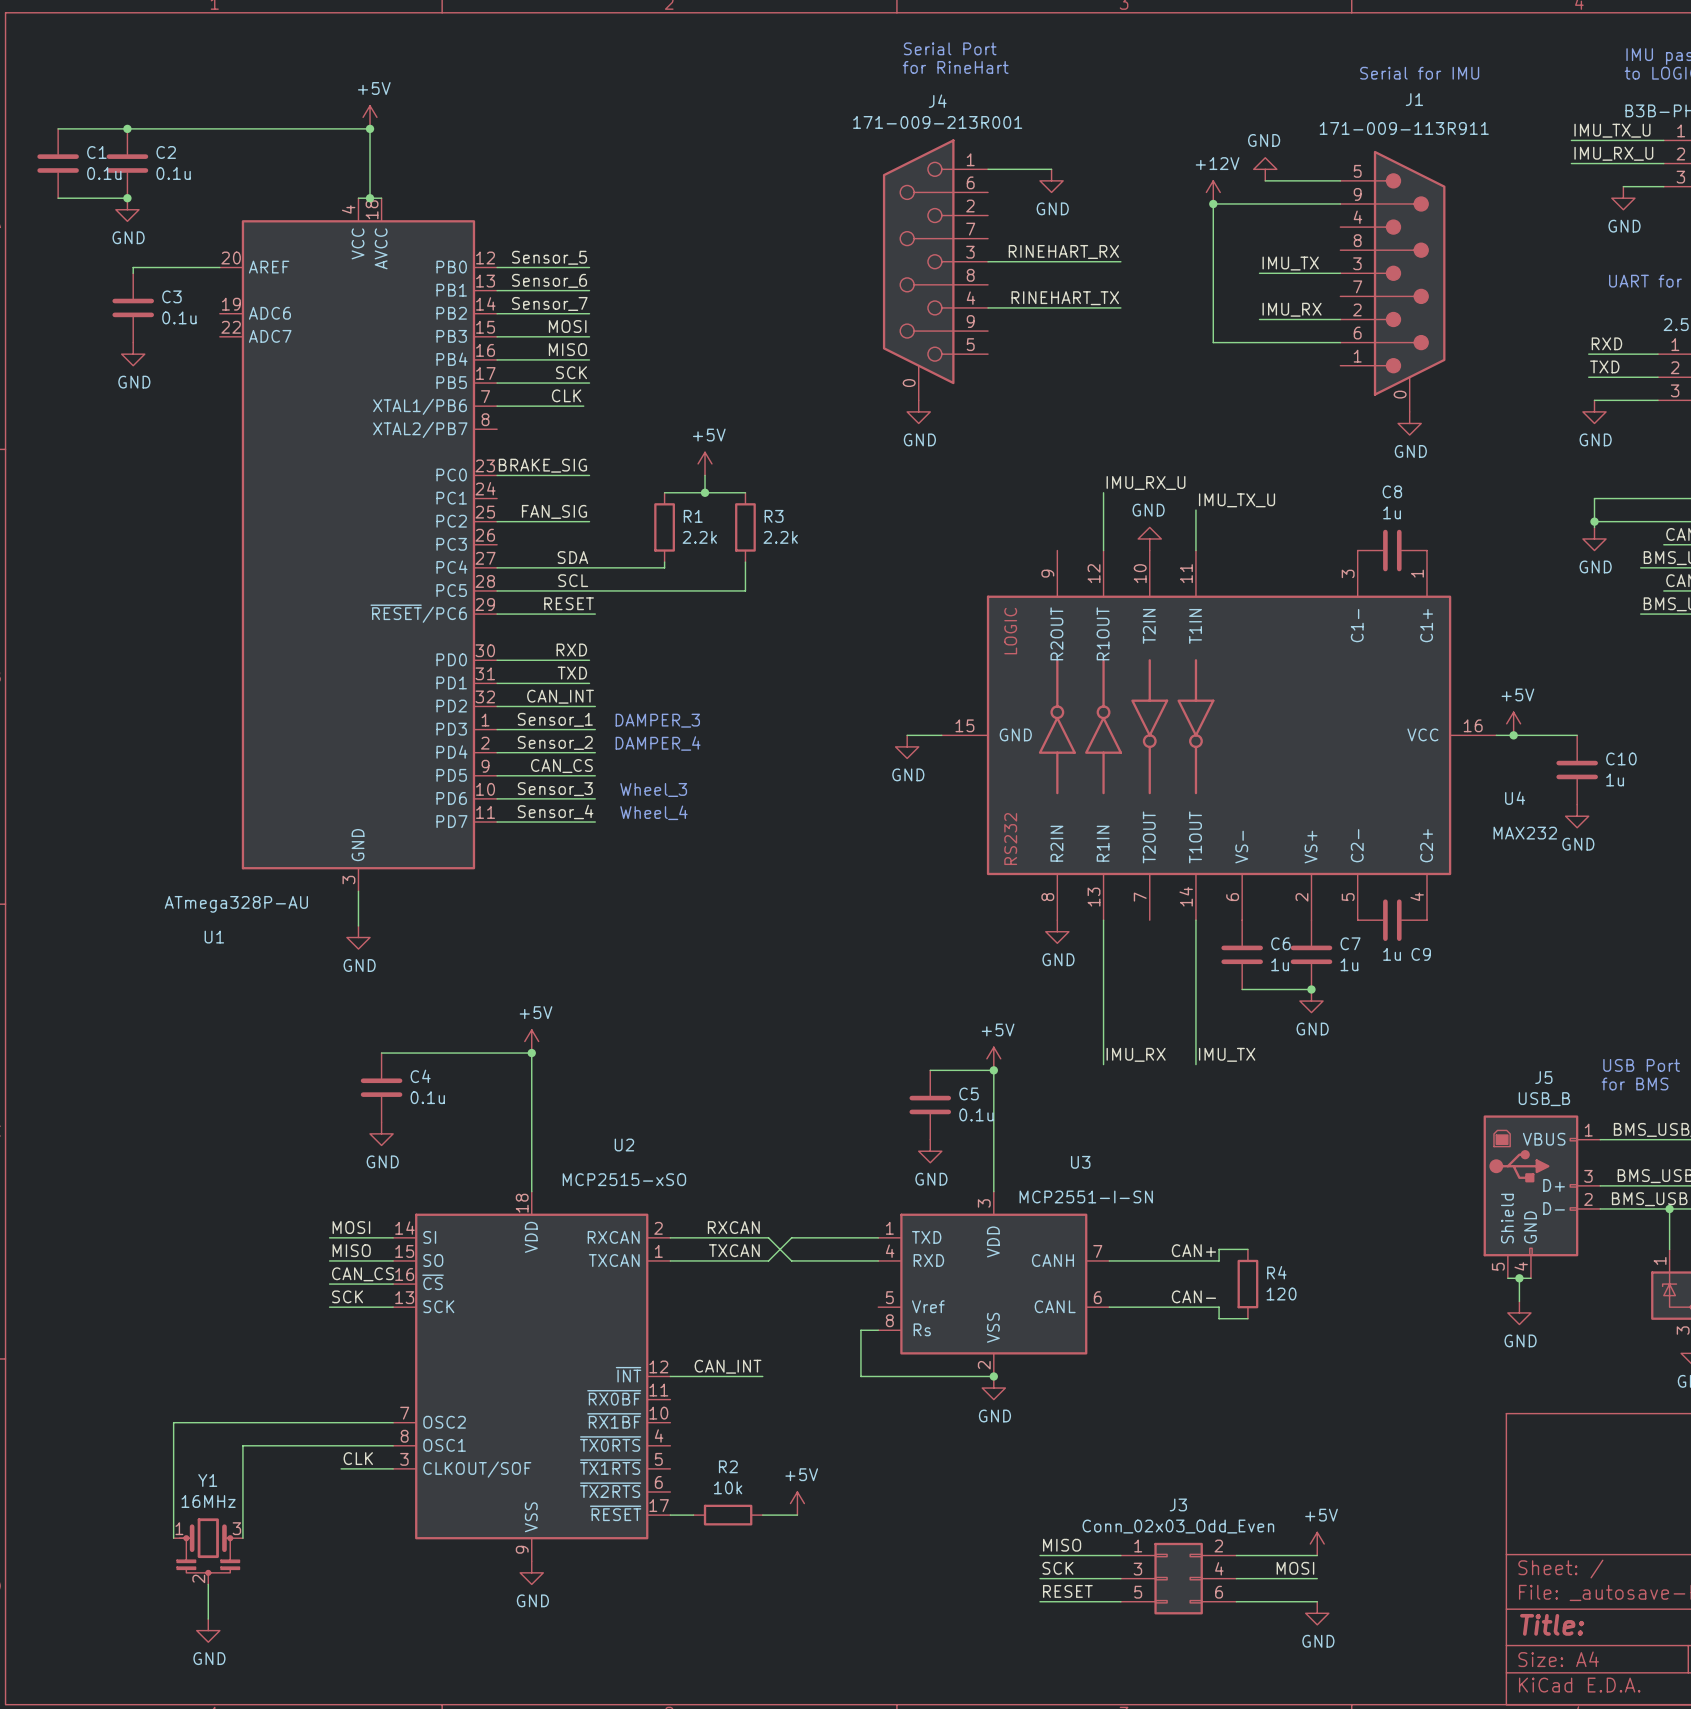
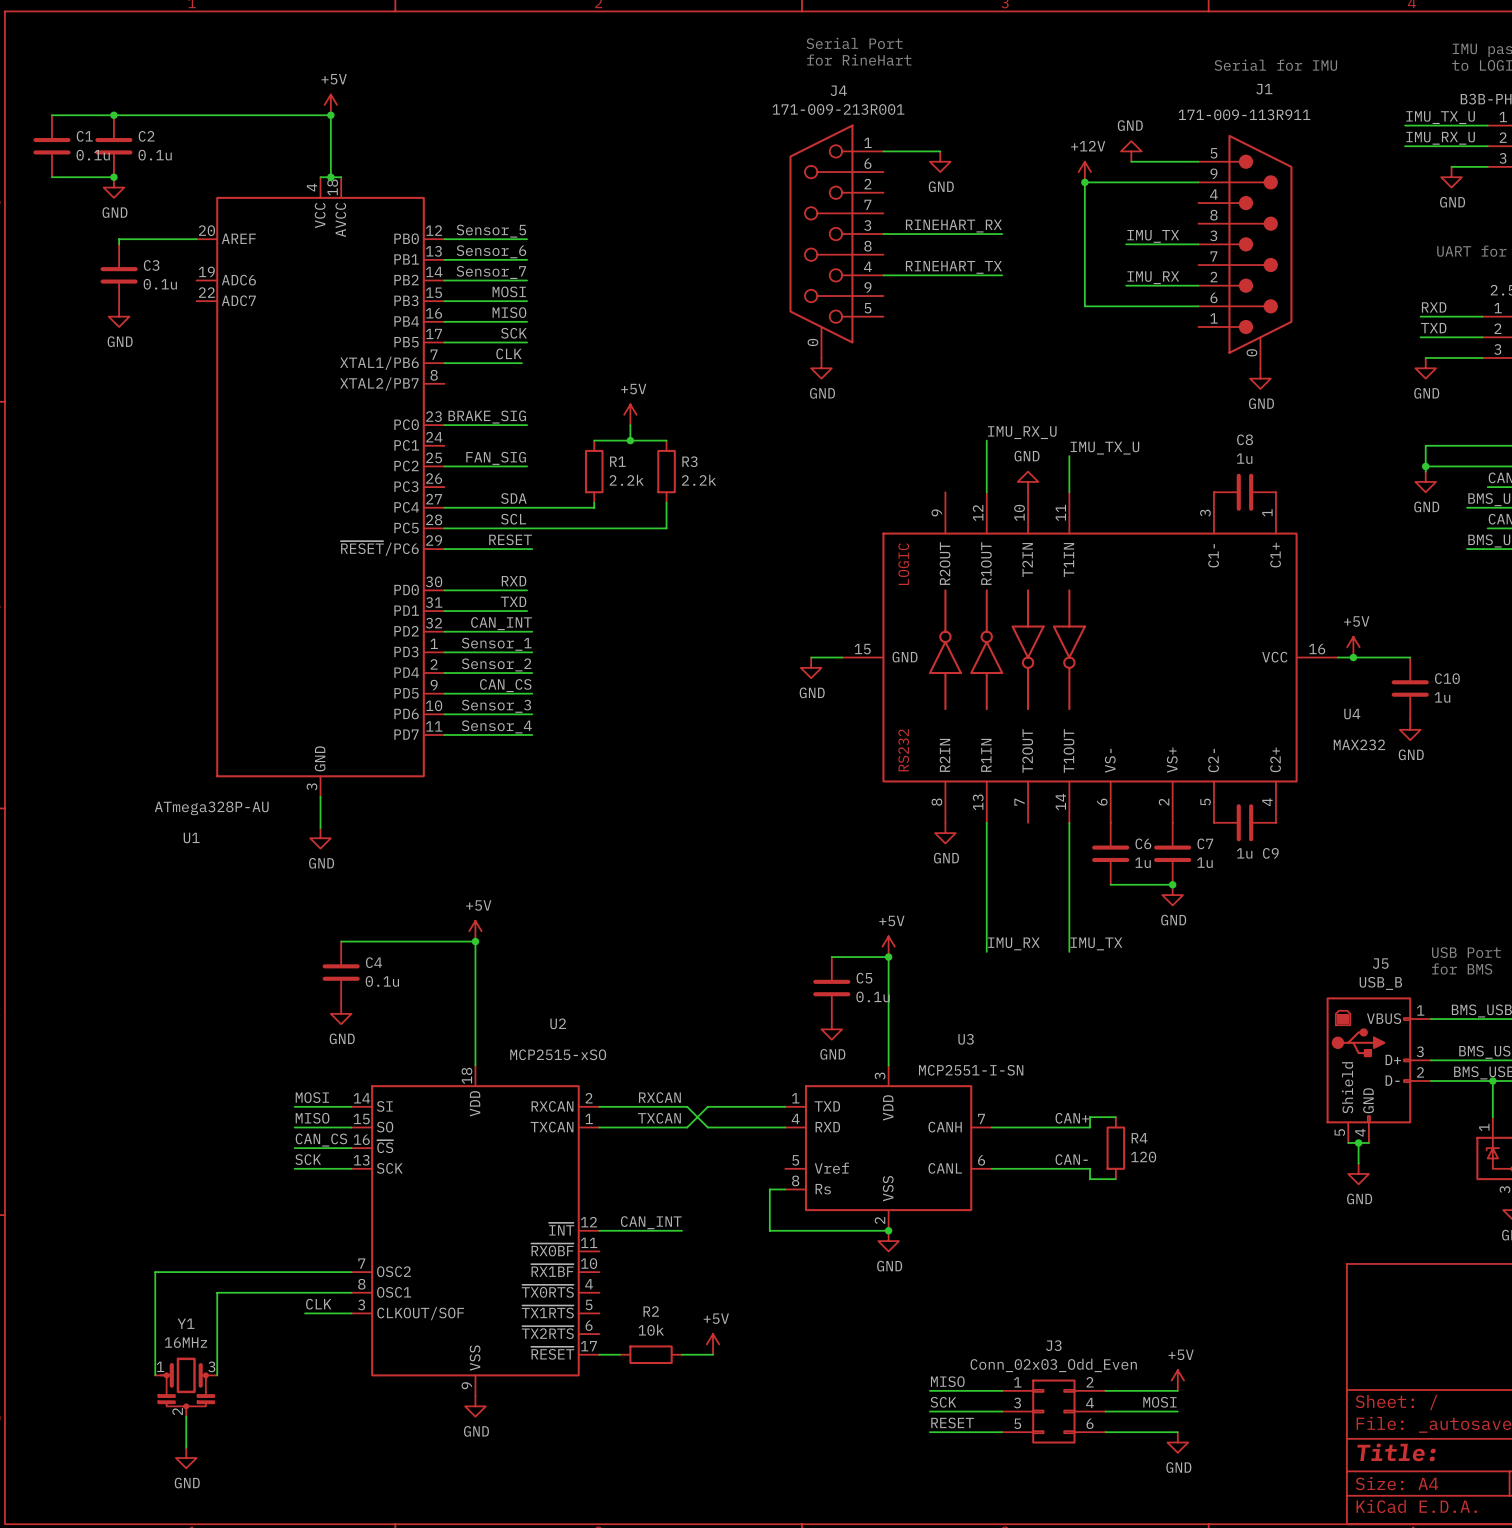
text: DAMPER_3 (657, 720) -> none
text: DAMPER_4 (658, 743) -> none
text: Wheel_3 (653, 789) -> none
text: Wheel_4 (653, 812) -> none

